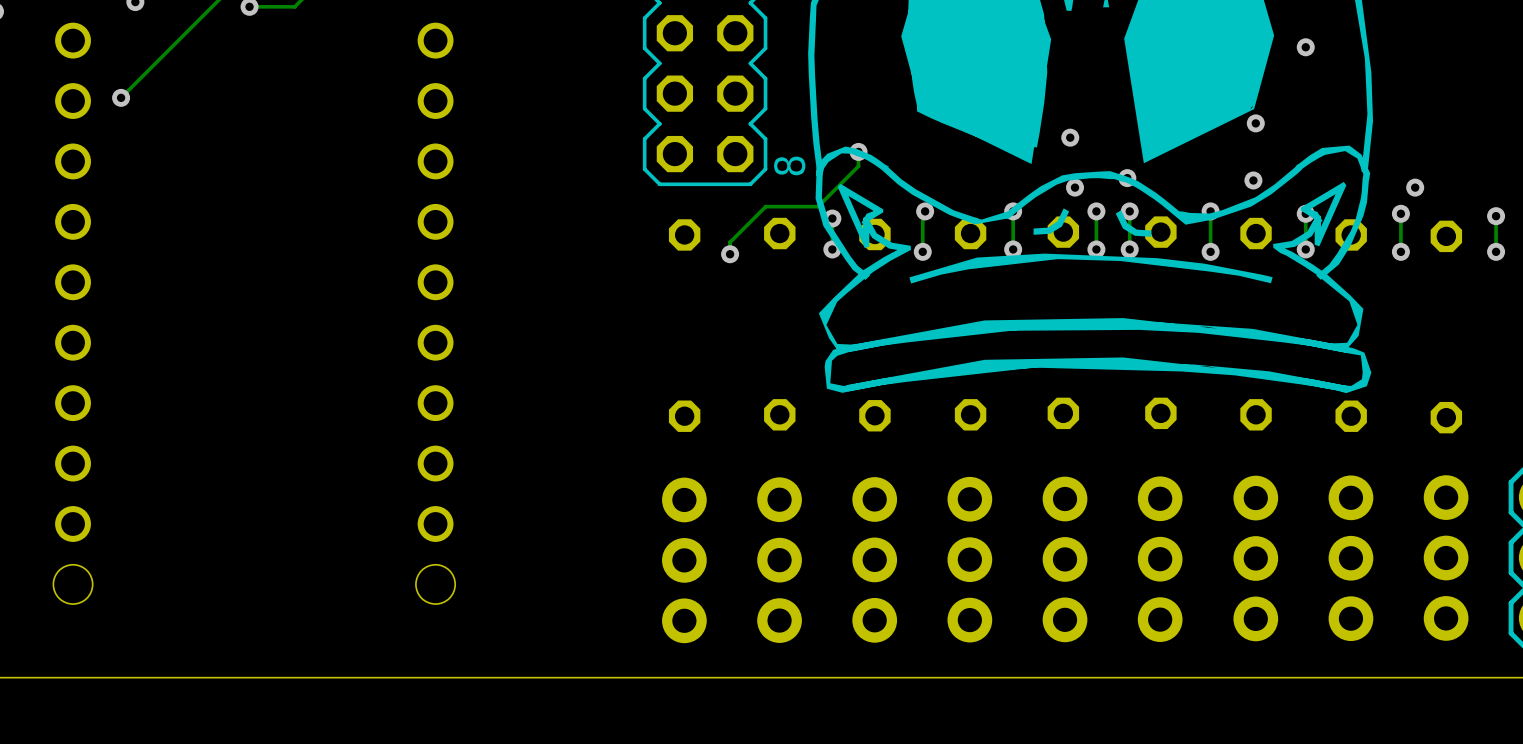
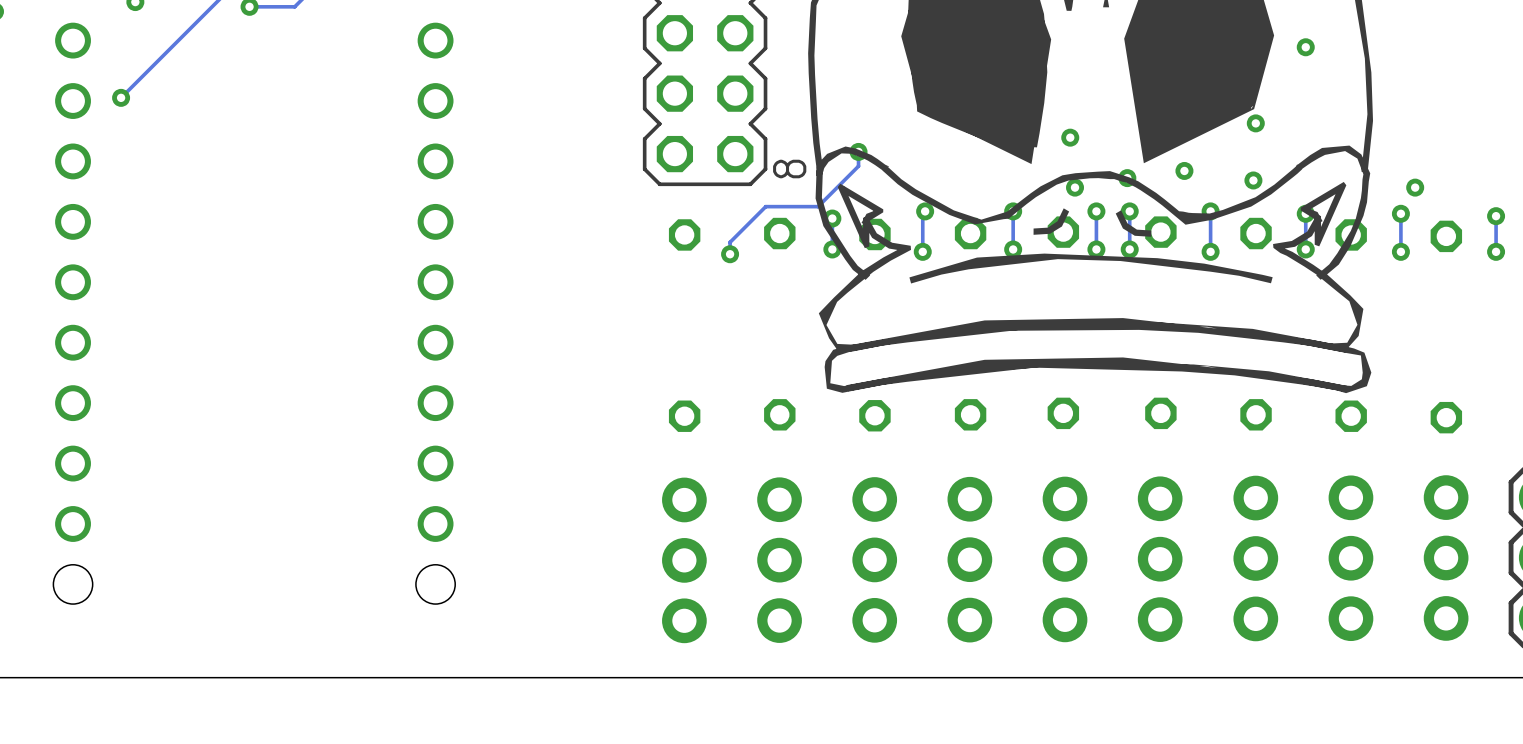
via: none -> (1184, 170)

